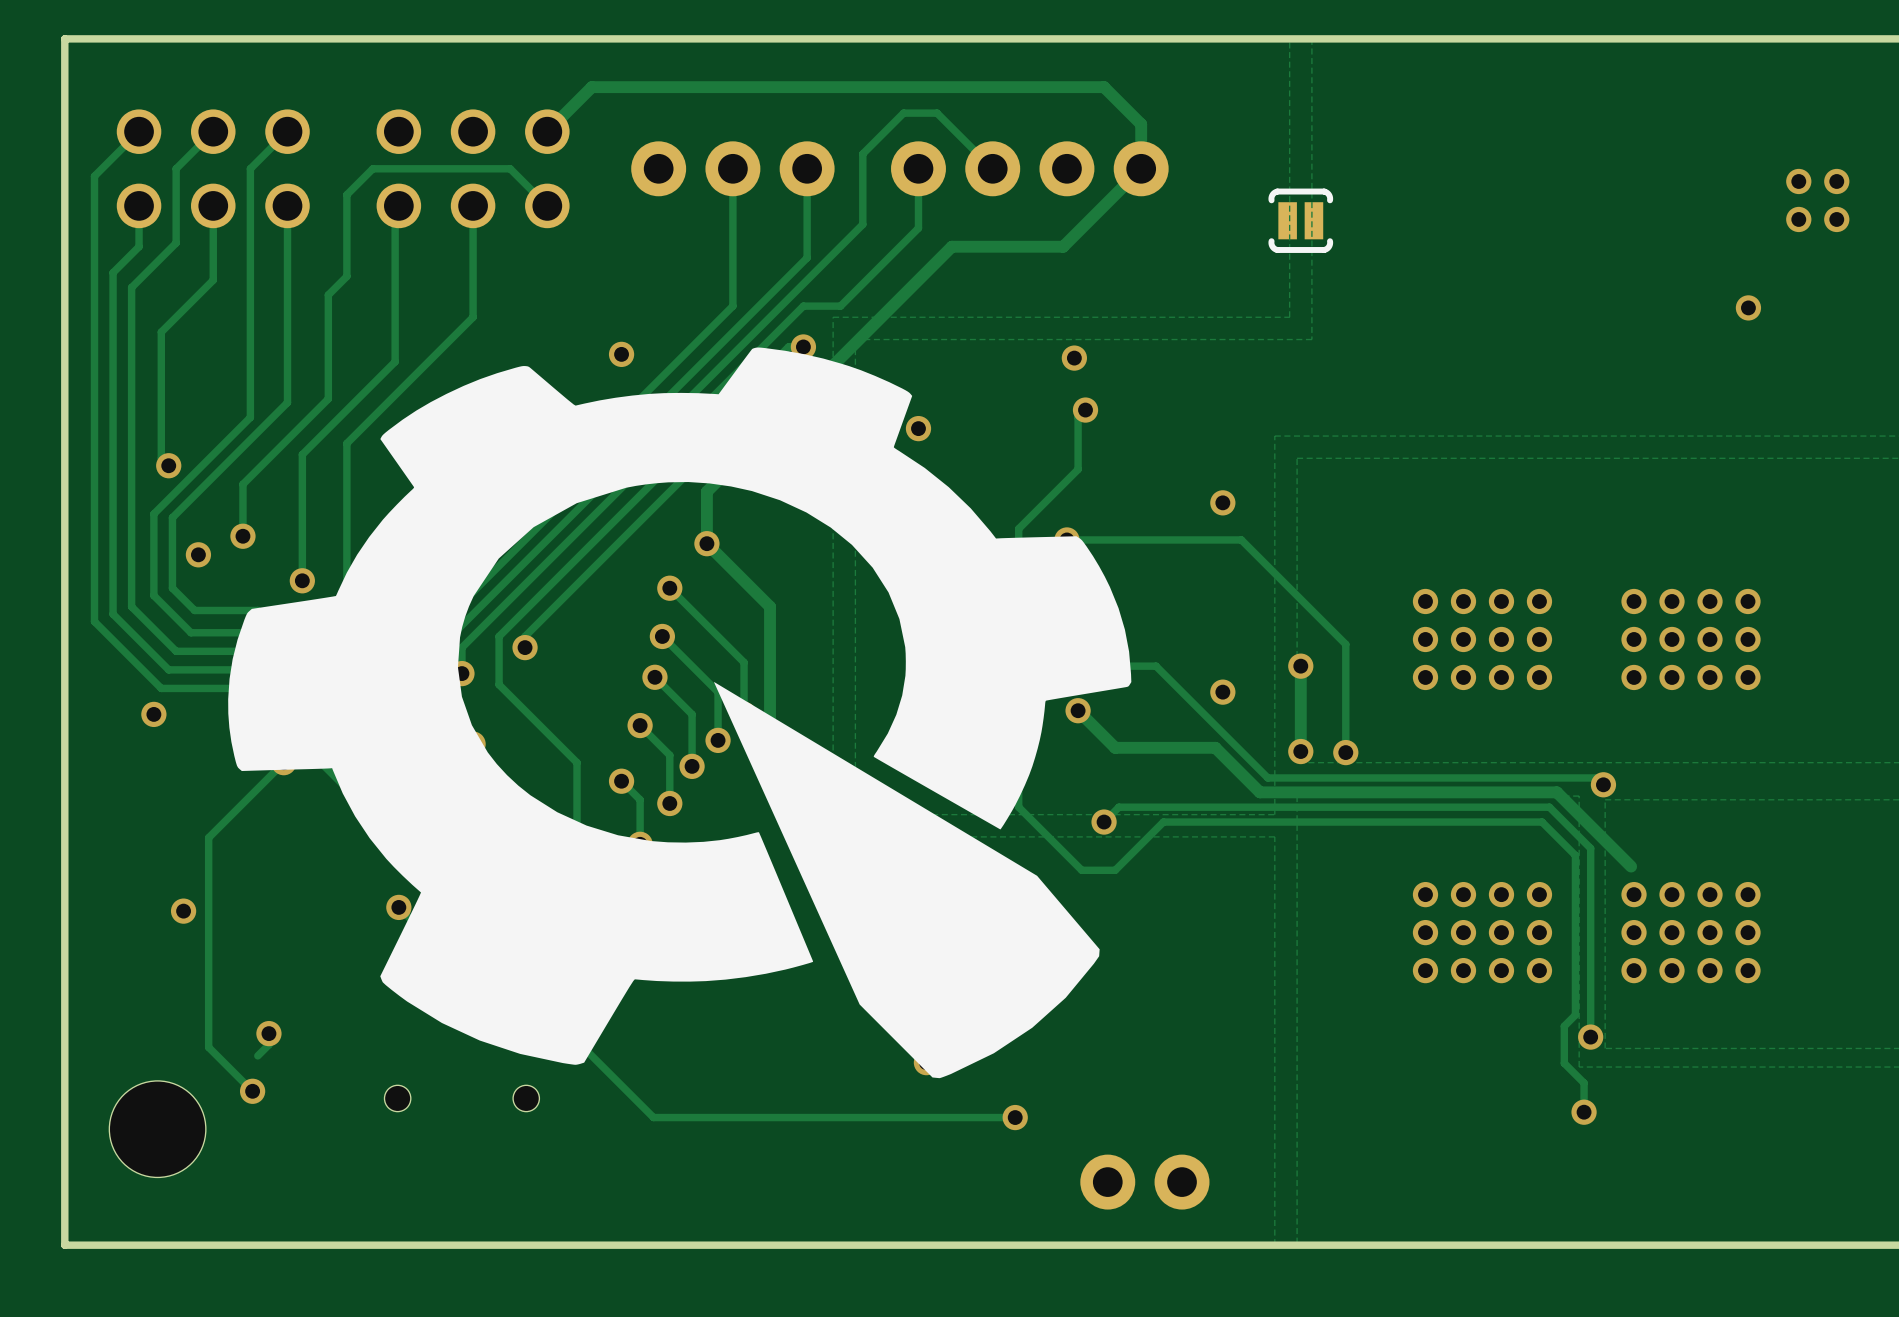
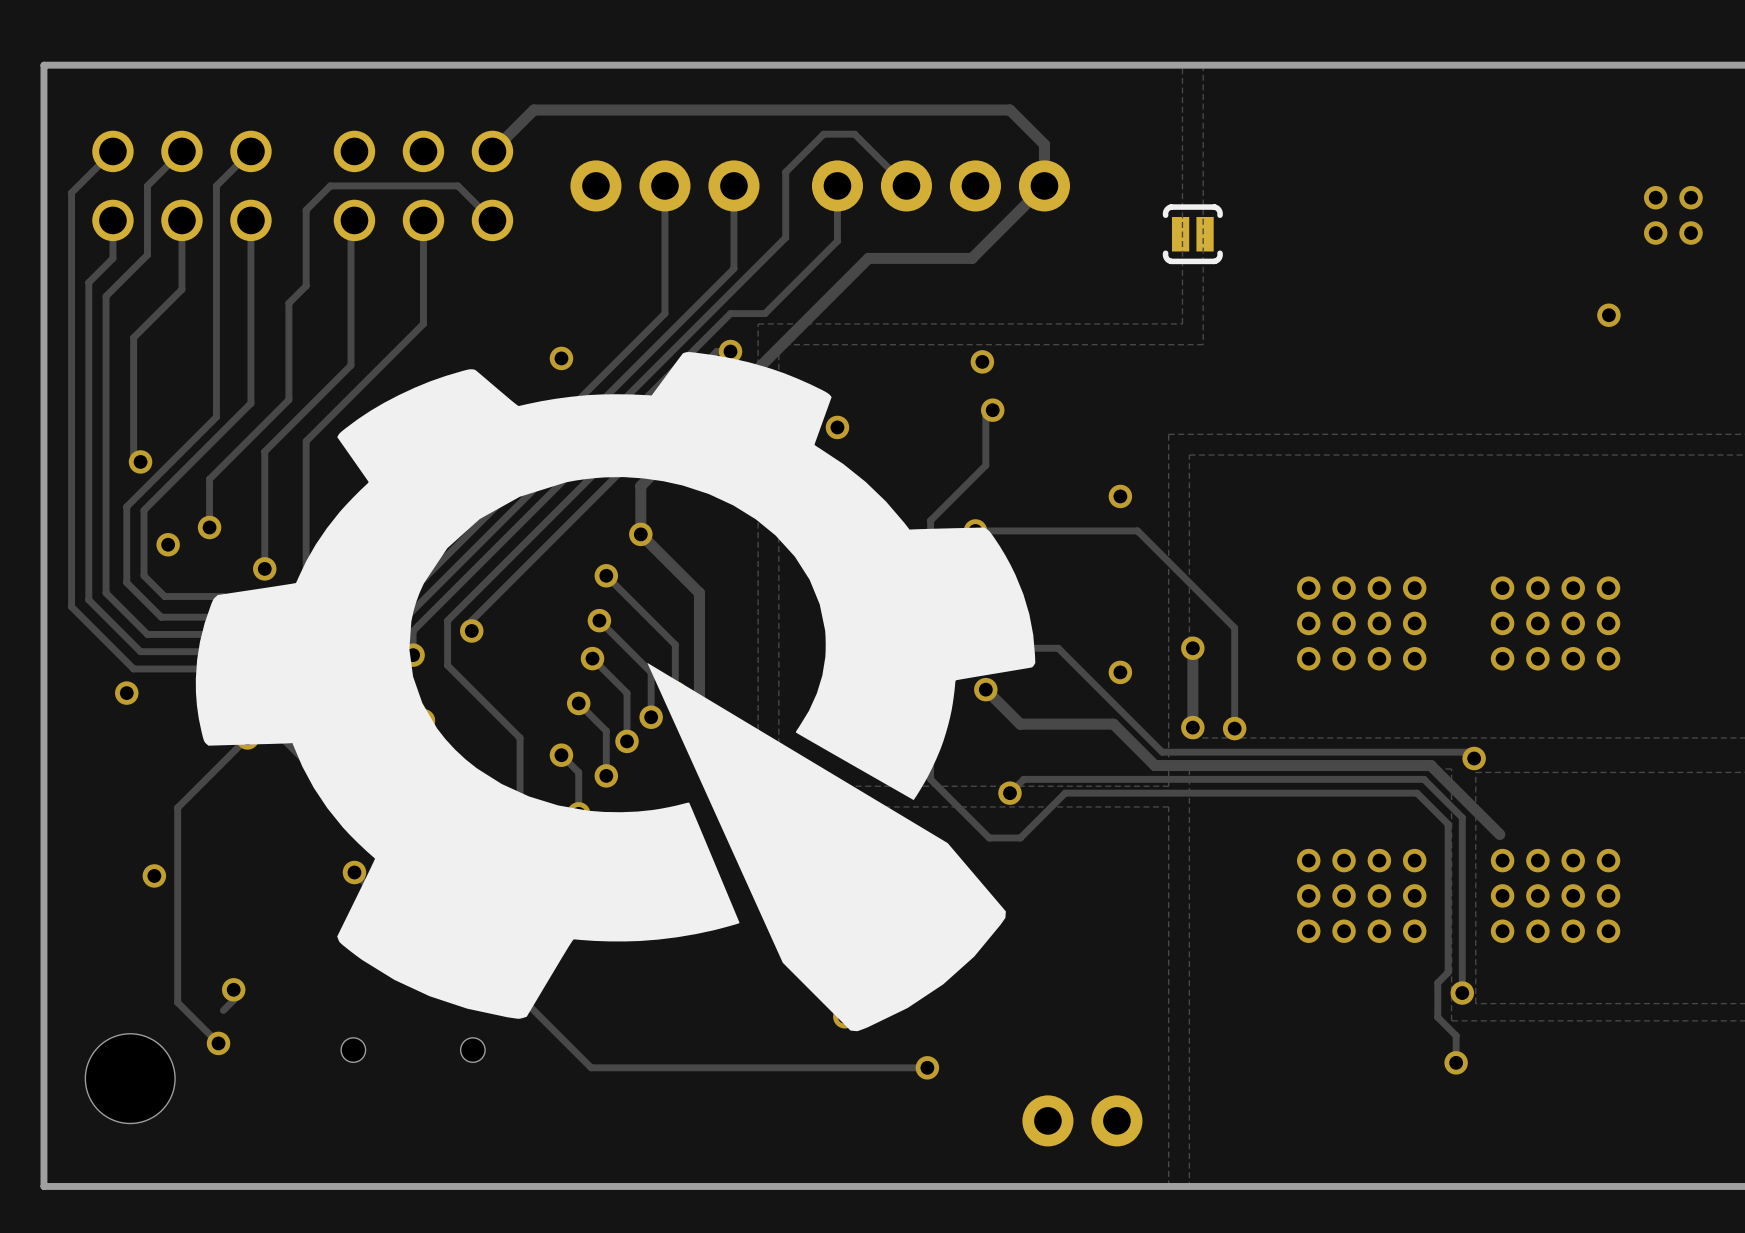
part position: (1144, 1182) -> (1082, 1120)

